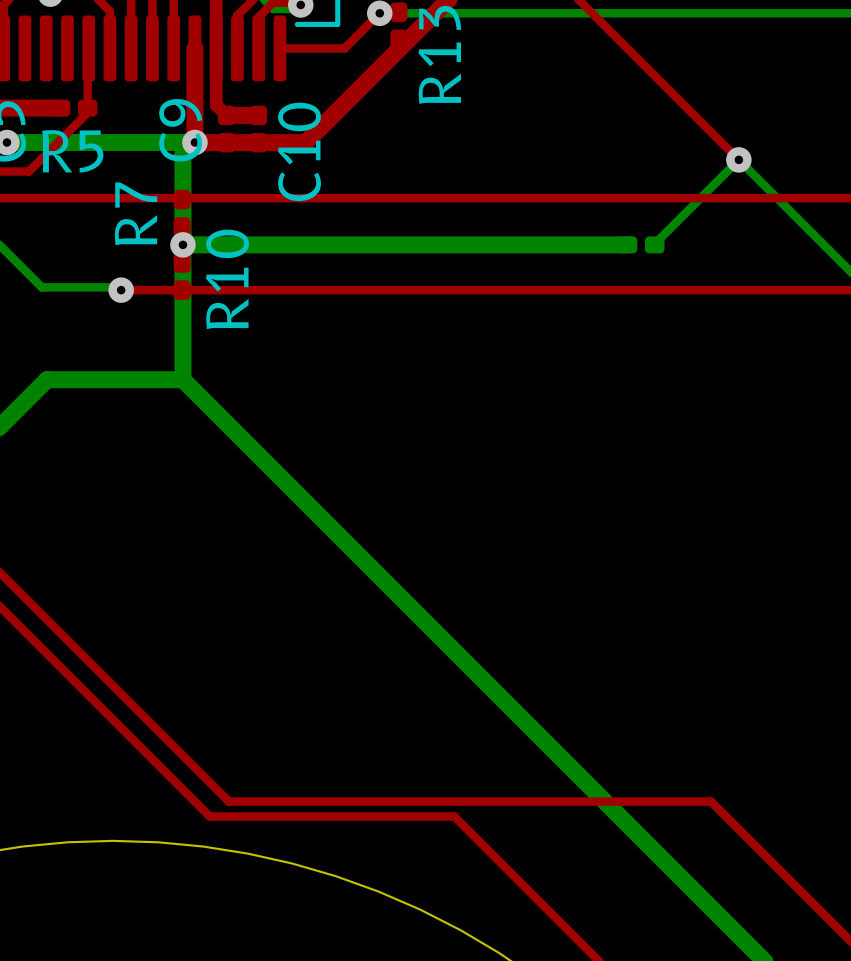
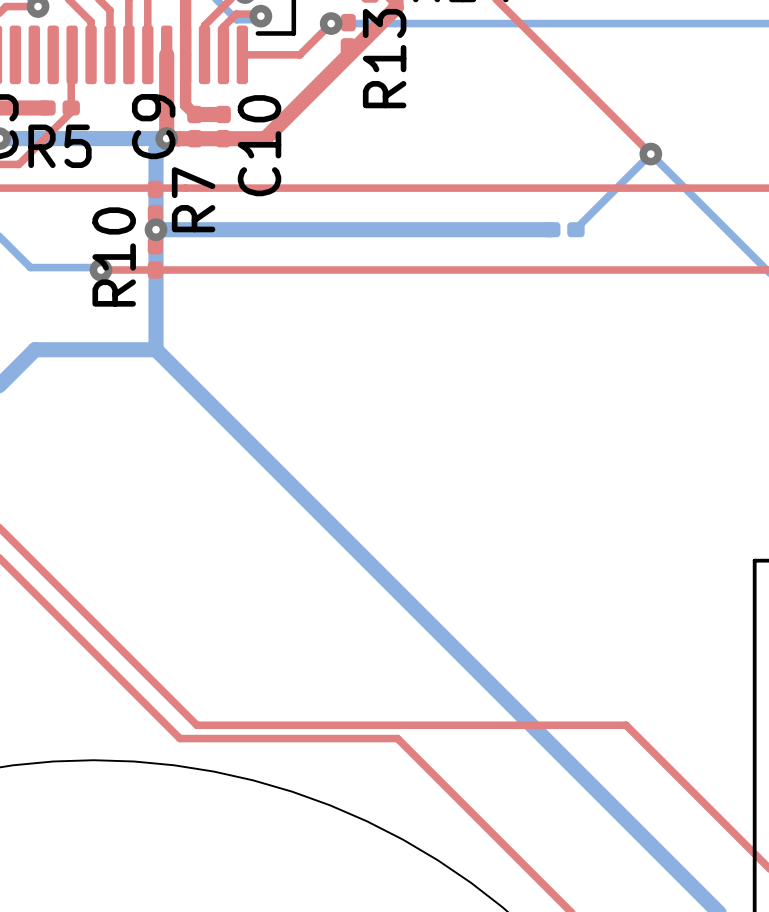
R7 name position: R7 (136, 213) -> R7 (193, 199)
R10 name position: R10 (227, 279) -> R10 (114, 257)

